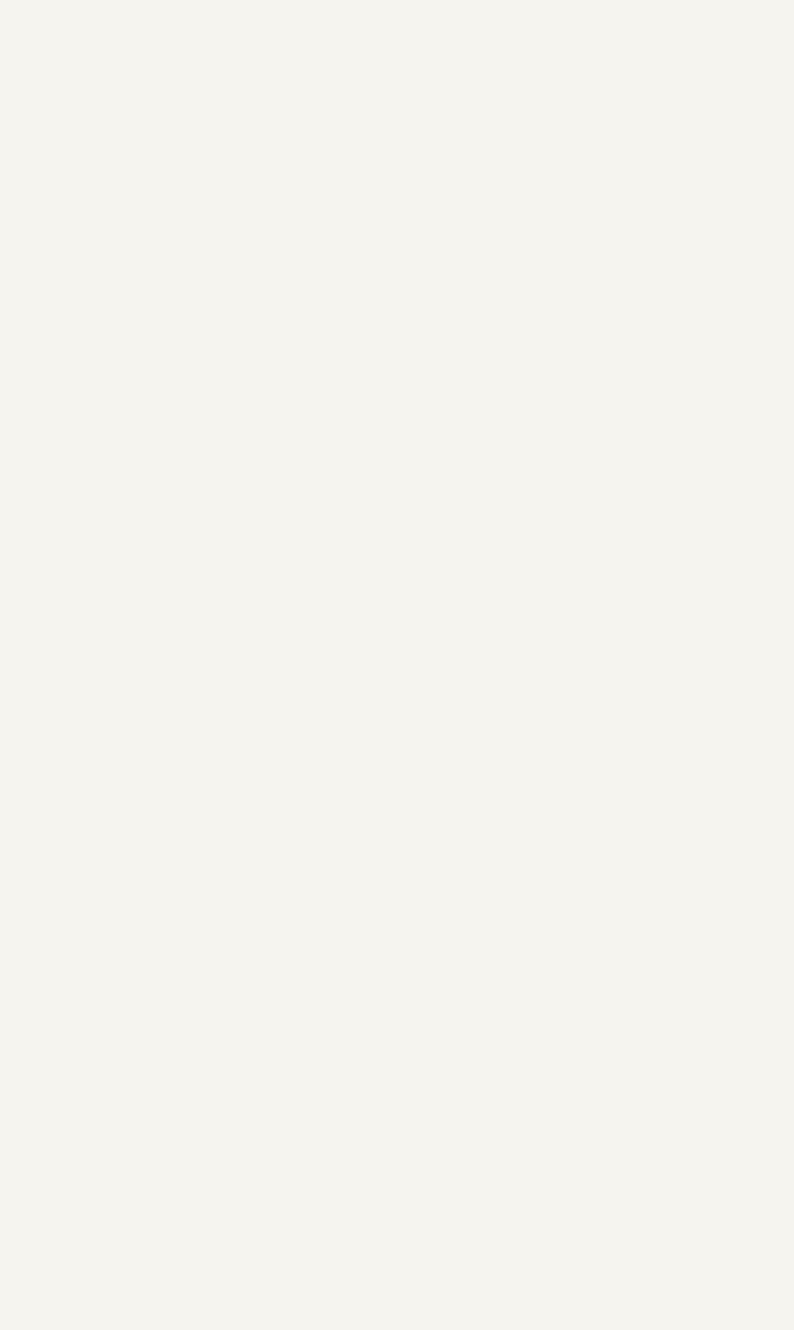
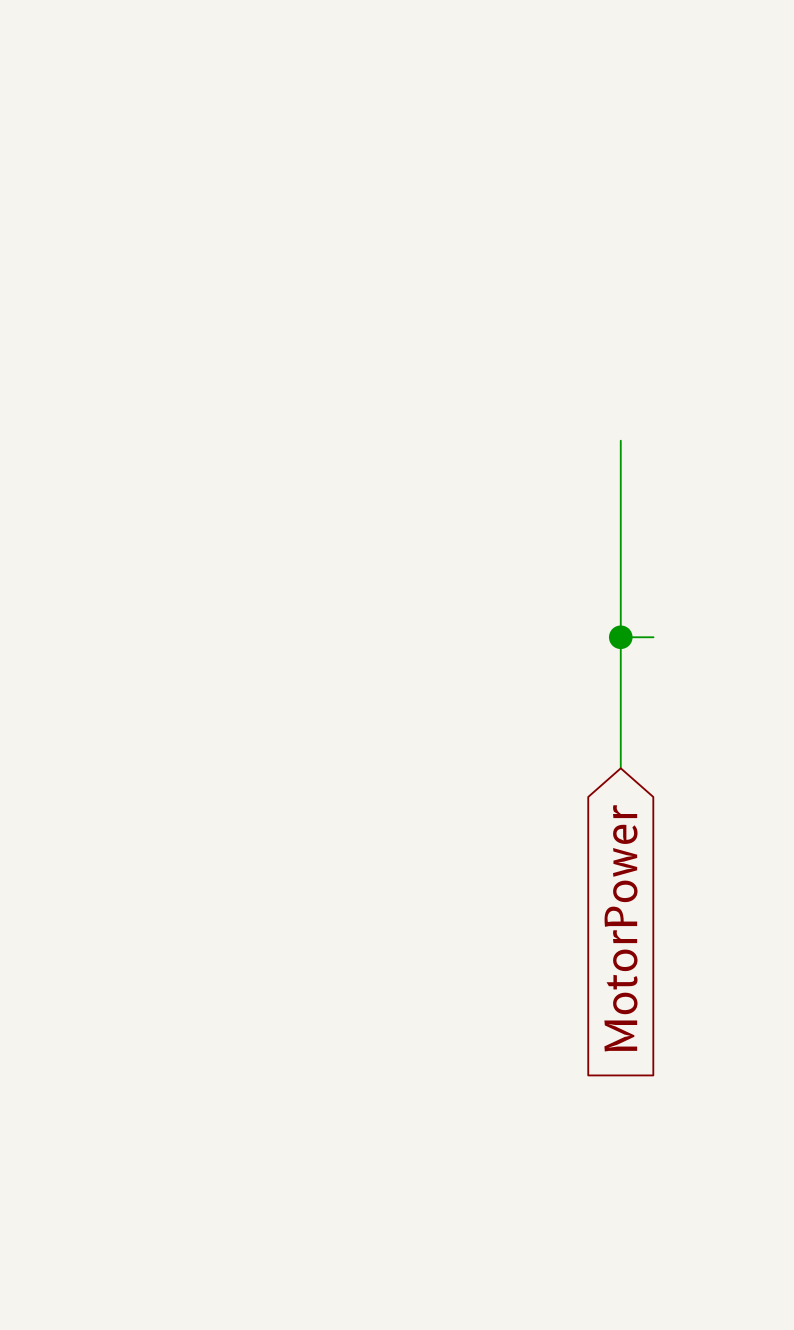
wire: none -> (620, 440) (620, 768)
wire: none -> (620, 637) (653, 637)
junction: none -> (620, 637)
global label: none -> MotorPower (620, 928)

